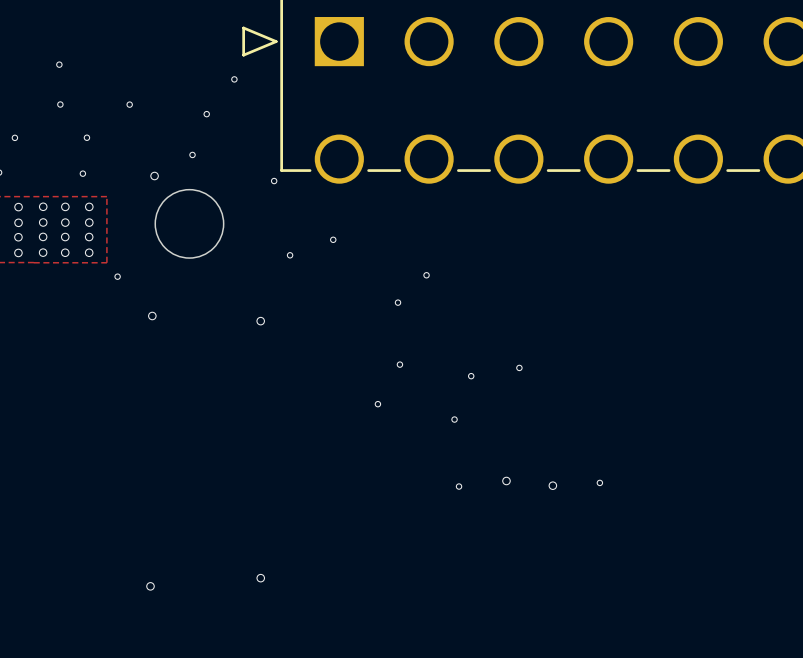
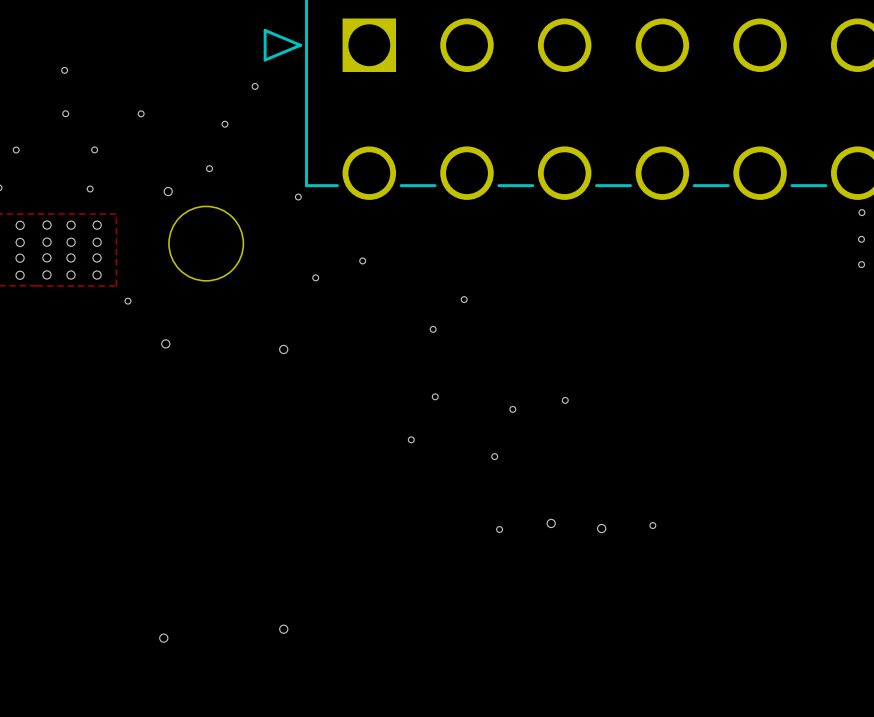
via: none -> (861, 212)
via: none -> (861, 239)
via: none -> (861, 264)

